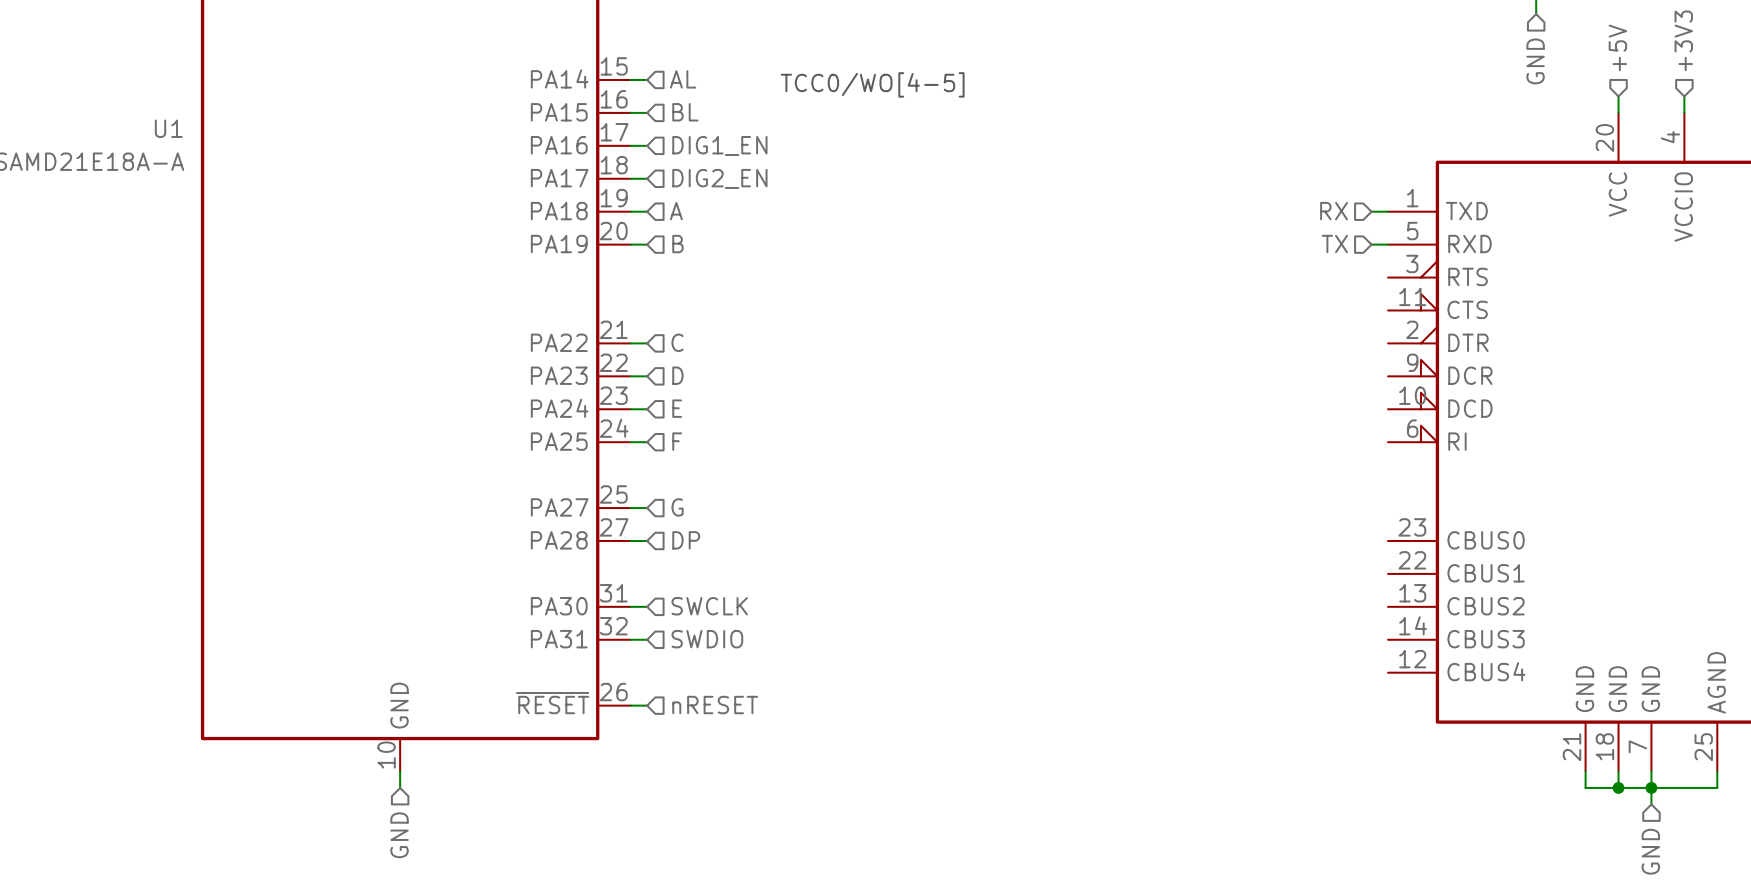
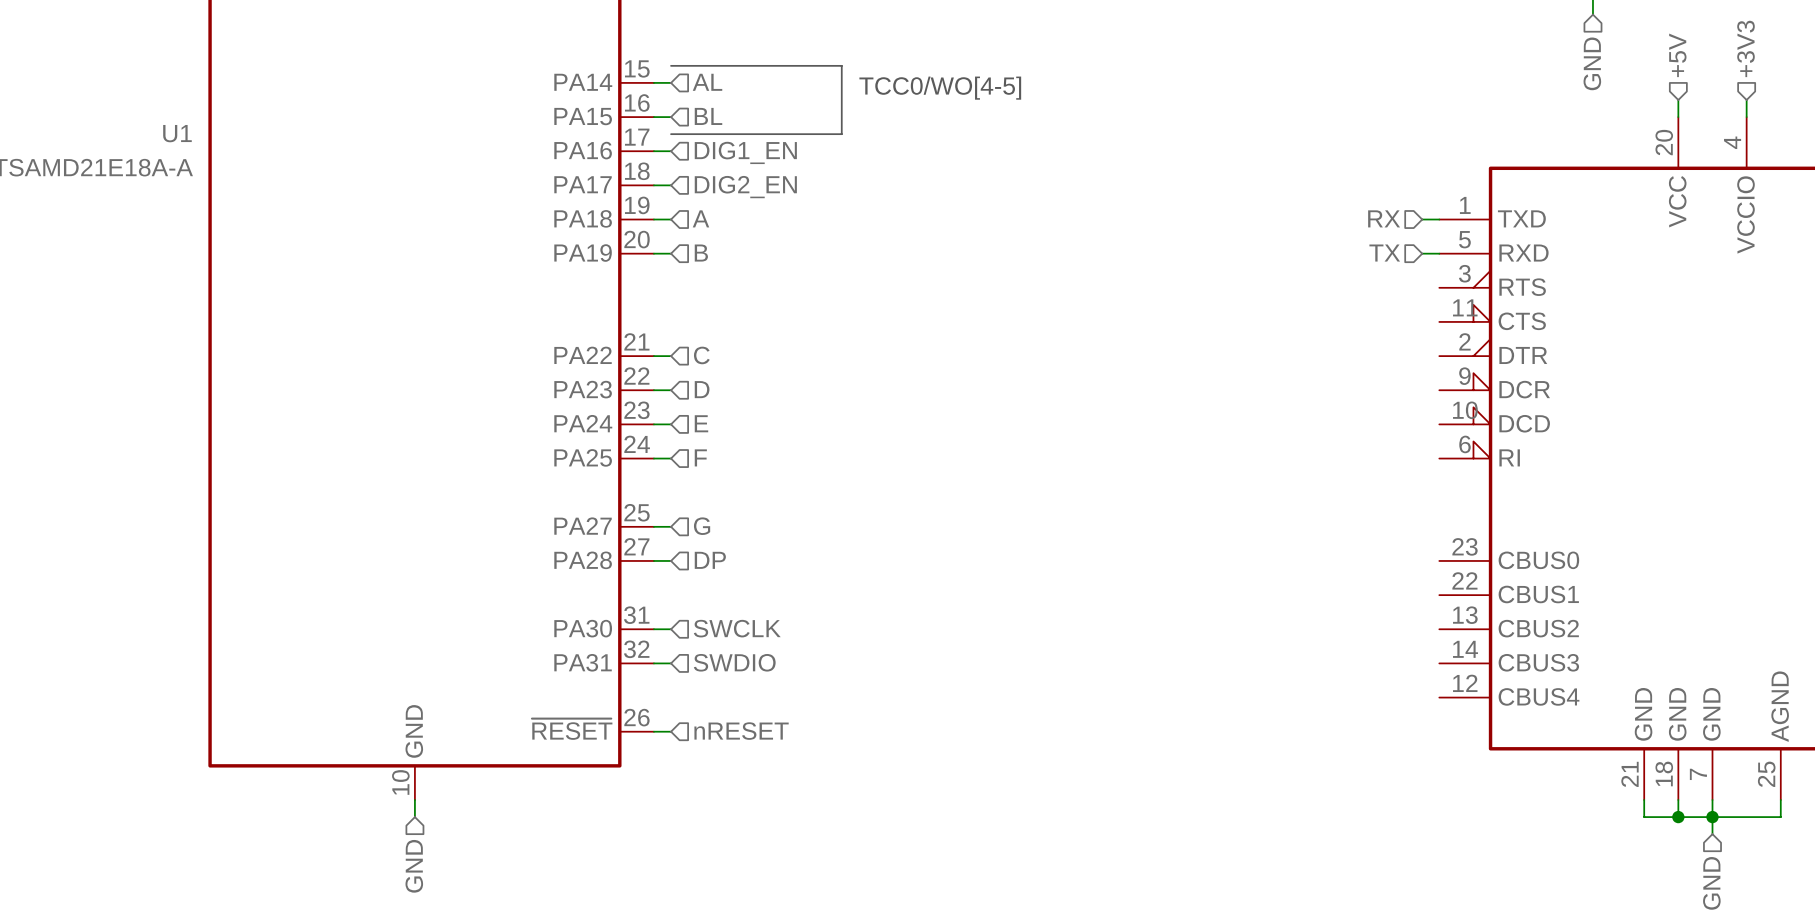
line: none -> (671, 65) (841, 65) (841, 134) (671, 134)
text position: TCC0/WO[4-5] (872, 84) -> TCC0/WO[4-5] (940, 88)

